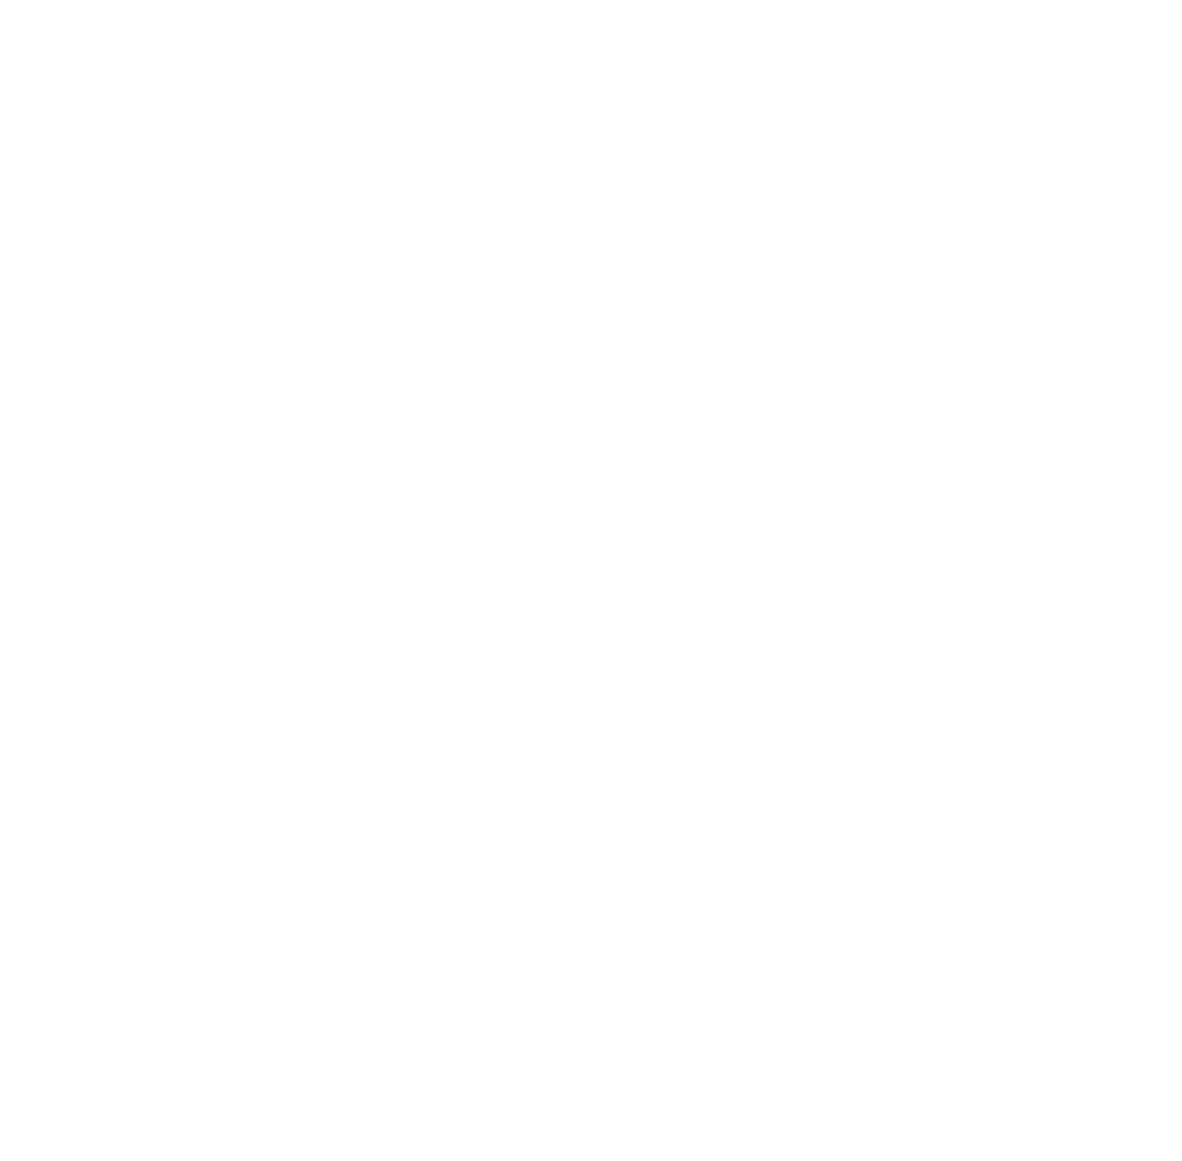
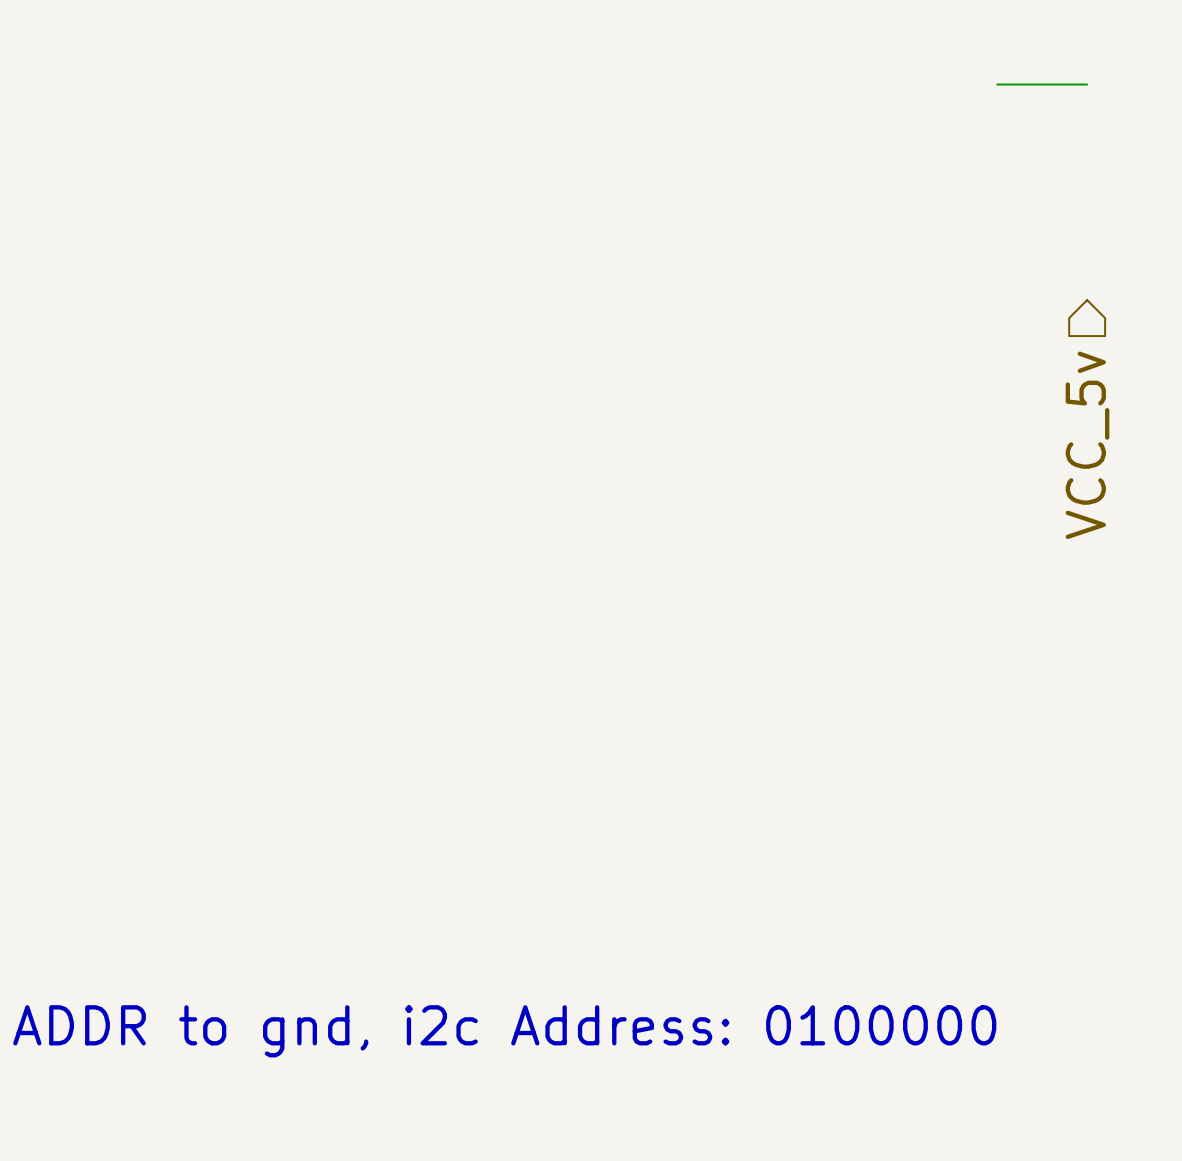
wire: none -> (997, 84) (1087, 84)
hierarchical label: none -> VCC_5v (1087, 445)
text: none -> ADDR to gnd, i2c Address: 0100000 (504, 1031)

